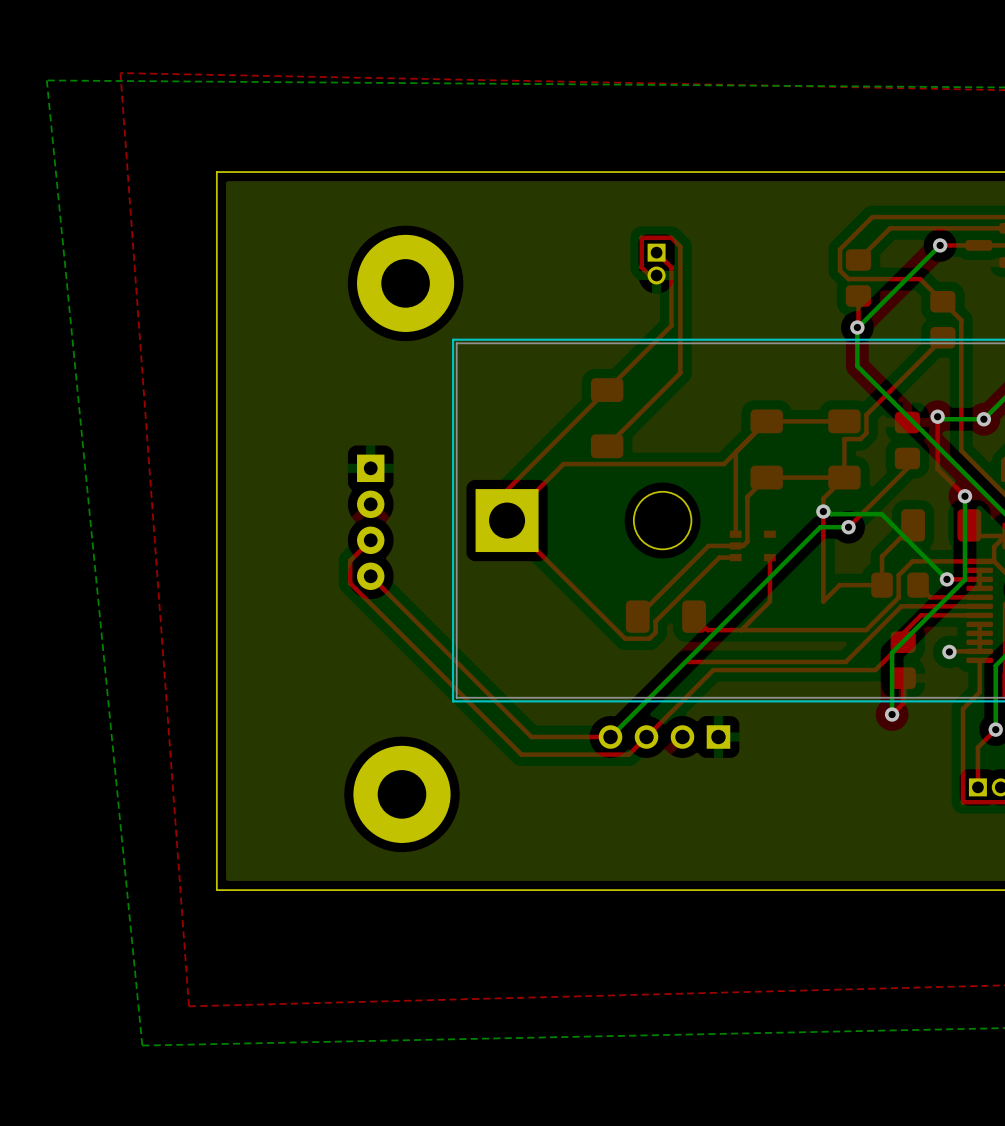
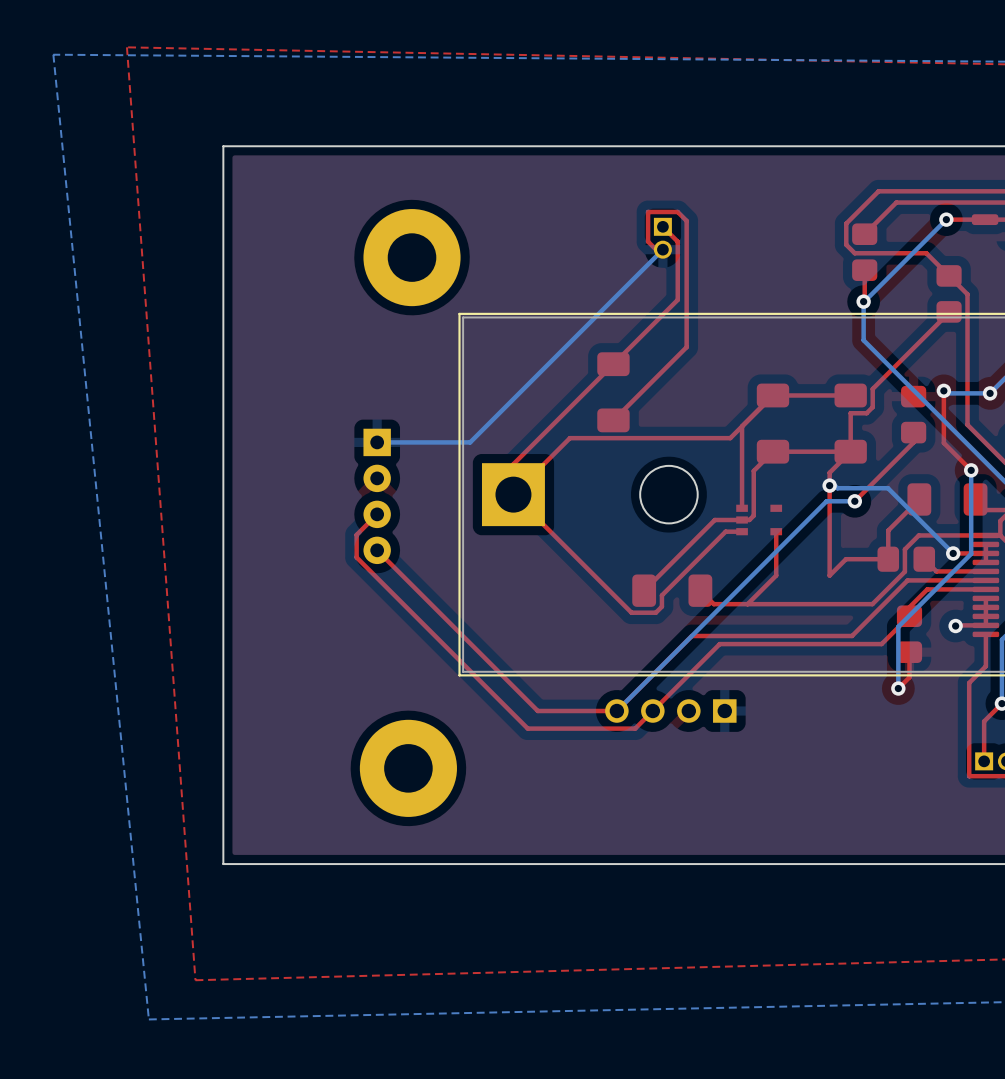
bottom track: none -> (662, 249) (470, 442) (377, 442)

